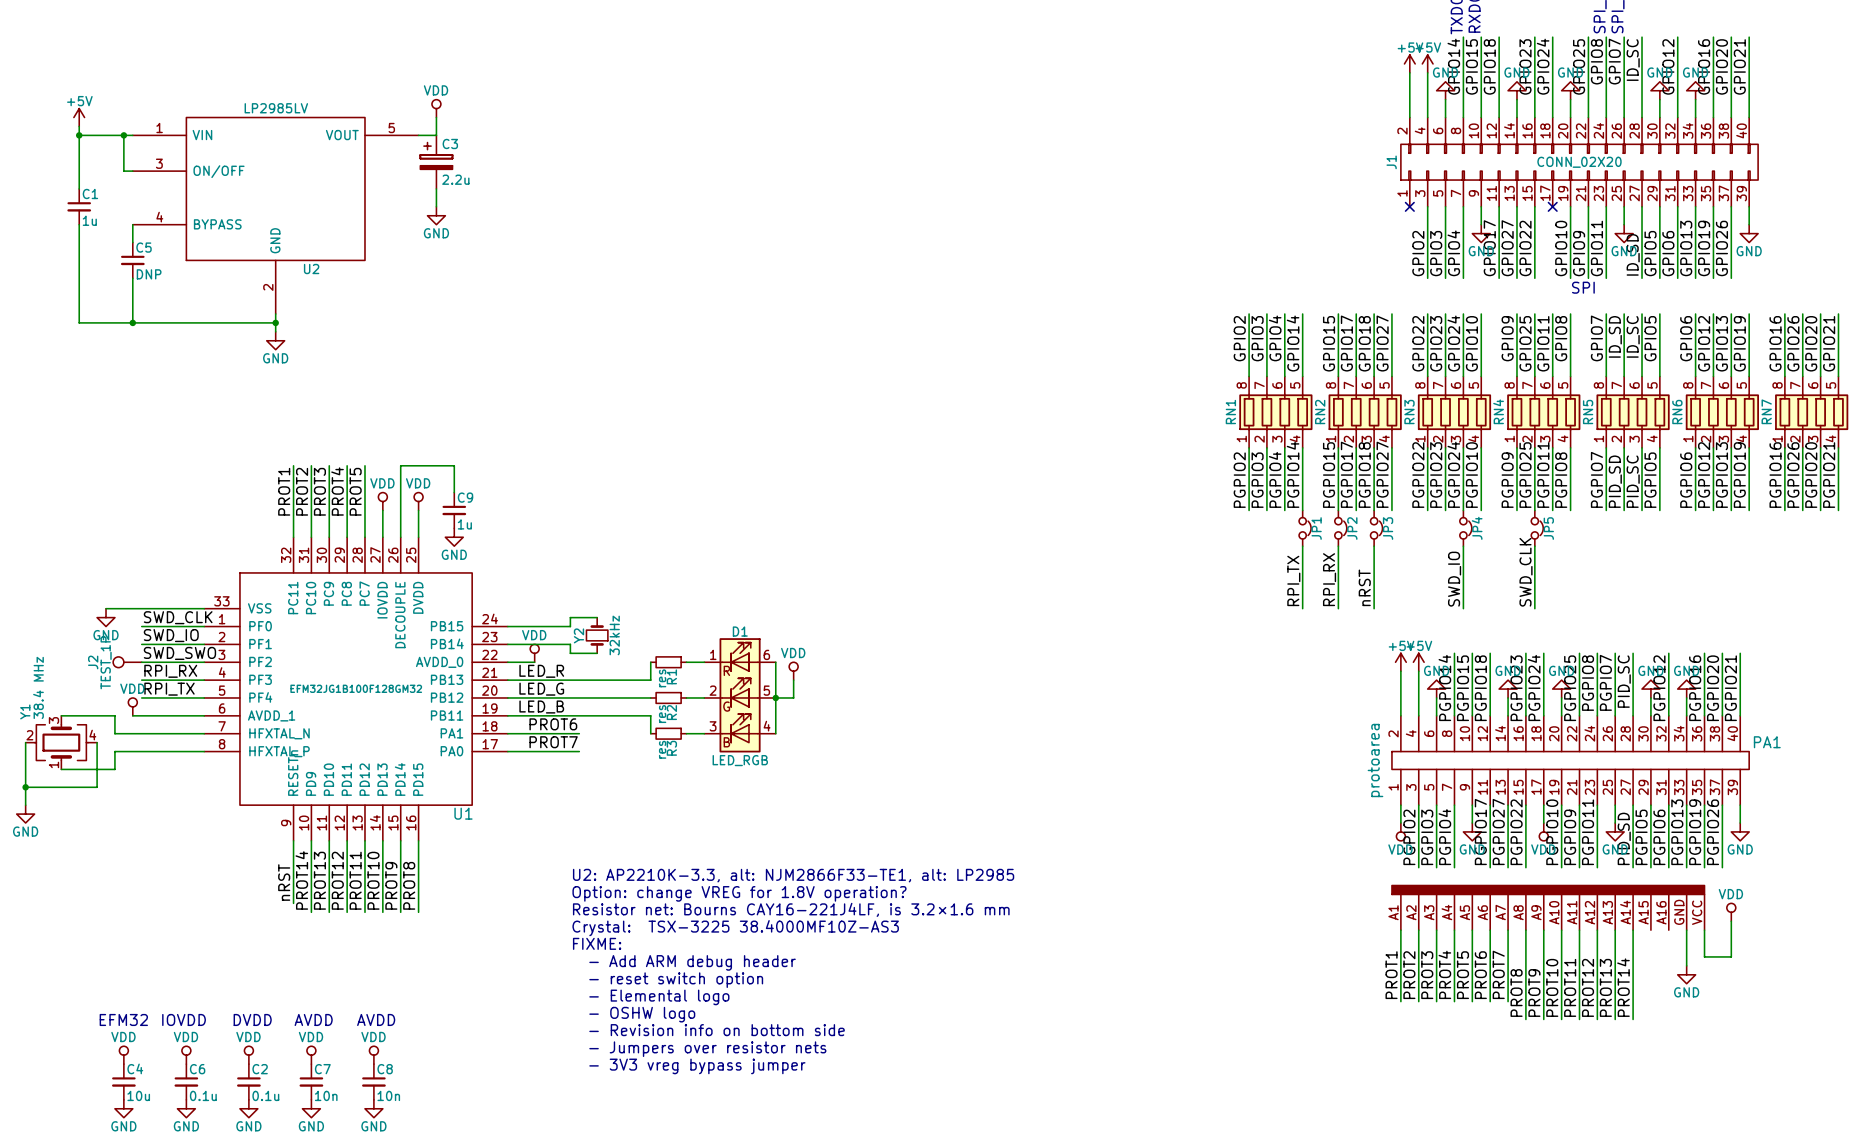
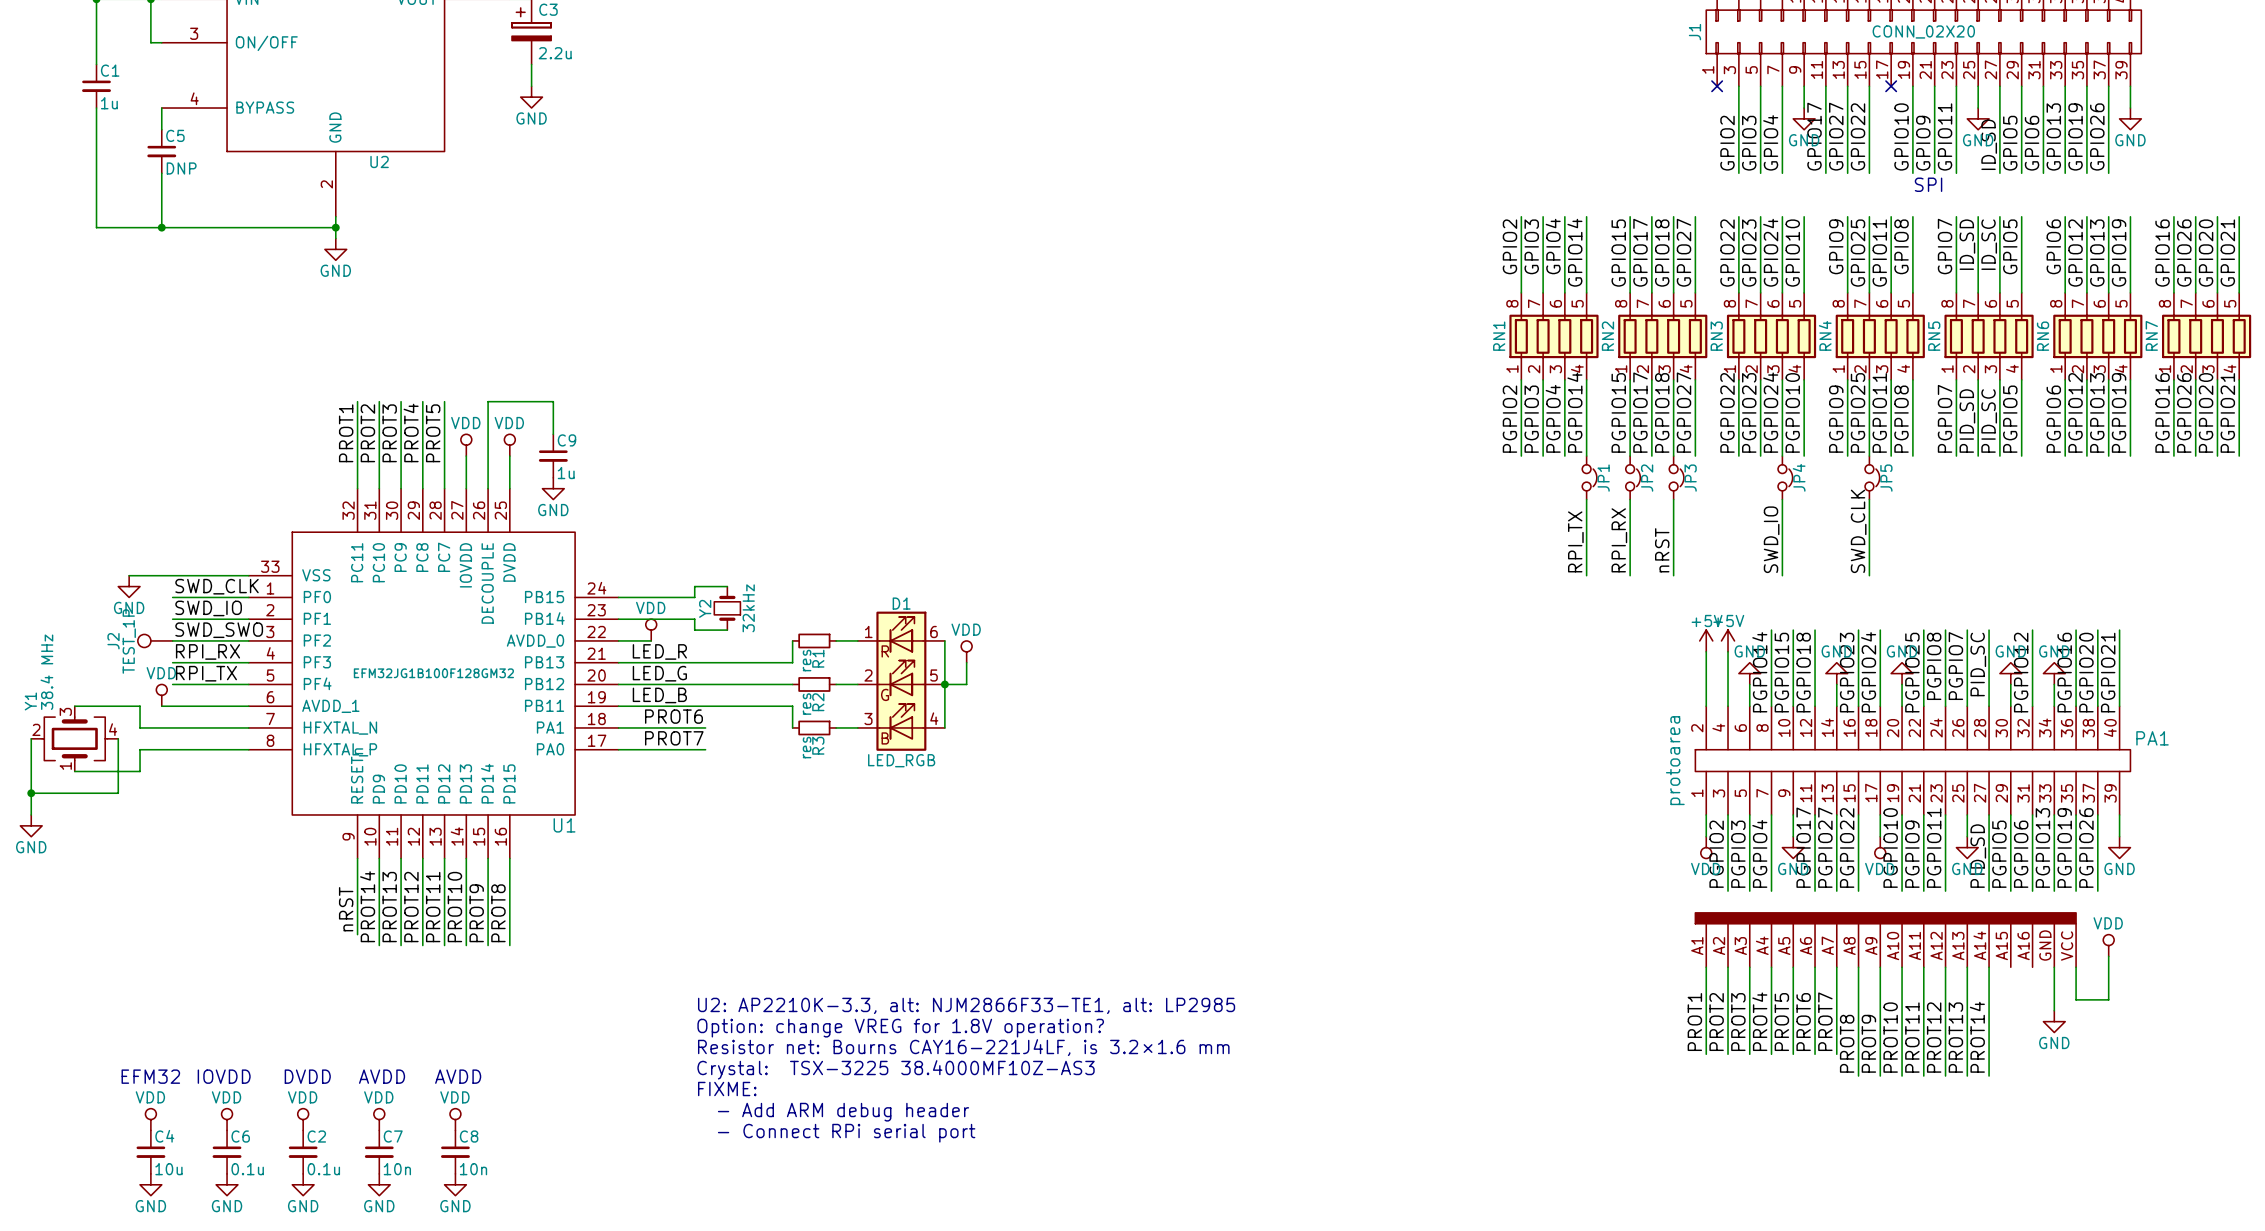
text: U2: AP2210K-3.3, alt: NJM2866F33-TE1, alt: LP2985 (793, 875) -> none
text: Option: change VREG for 1.8V operation? (739, 893) -> none
text: Resistor net: Bourns CAY16-221J4LF, is 3.2×1.6 mm (791, 909) -> none
text: Crystal: TSX-3225 38.4000MF10Z-AS3 (735, 928) -> none
text: FIXME: (597, 943) -> none
text: - Add ARM debug header (692, 962) -> U2: AP2210K-3.3, alt: NJM2866F33-TE1, alt: LP2985 (966, 1005)
text: - reset switch option (676, 980) -> Option: change VREG for 1.8V operation? (900, 1028)
text: - Elemental logo (659, 997) -> Resistor net: Bourns CAY16-221J4LF, is 3.2×1.6 mm (963, 1047)
text: - OSHW logo (642, 1014) -> Crystal: TSX-3225 38.4000MF10Z-AS3 (896, 1069)
text: - Revision info on bottom side (717, 1030) -> FIXME: (727, 1089)
text: - Jumpers over resistor nets (707, 1049) -> - Add ARM debug header (843, 1112)
text: - 3V3 vreg bypass jumper (697, 1066) -> - Connect RPi serial port (846, 1133)

